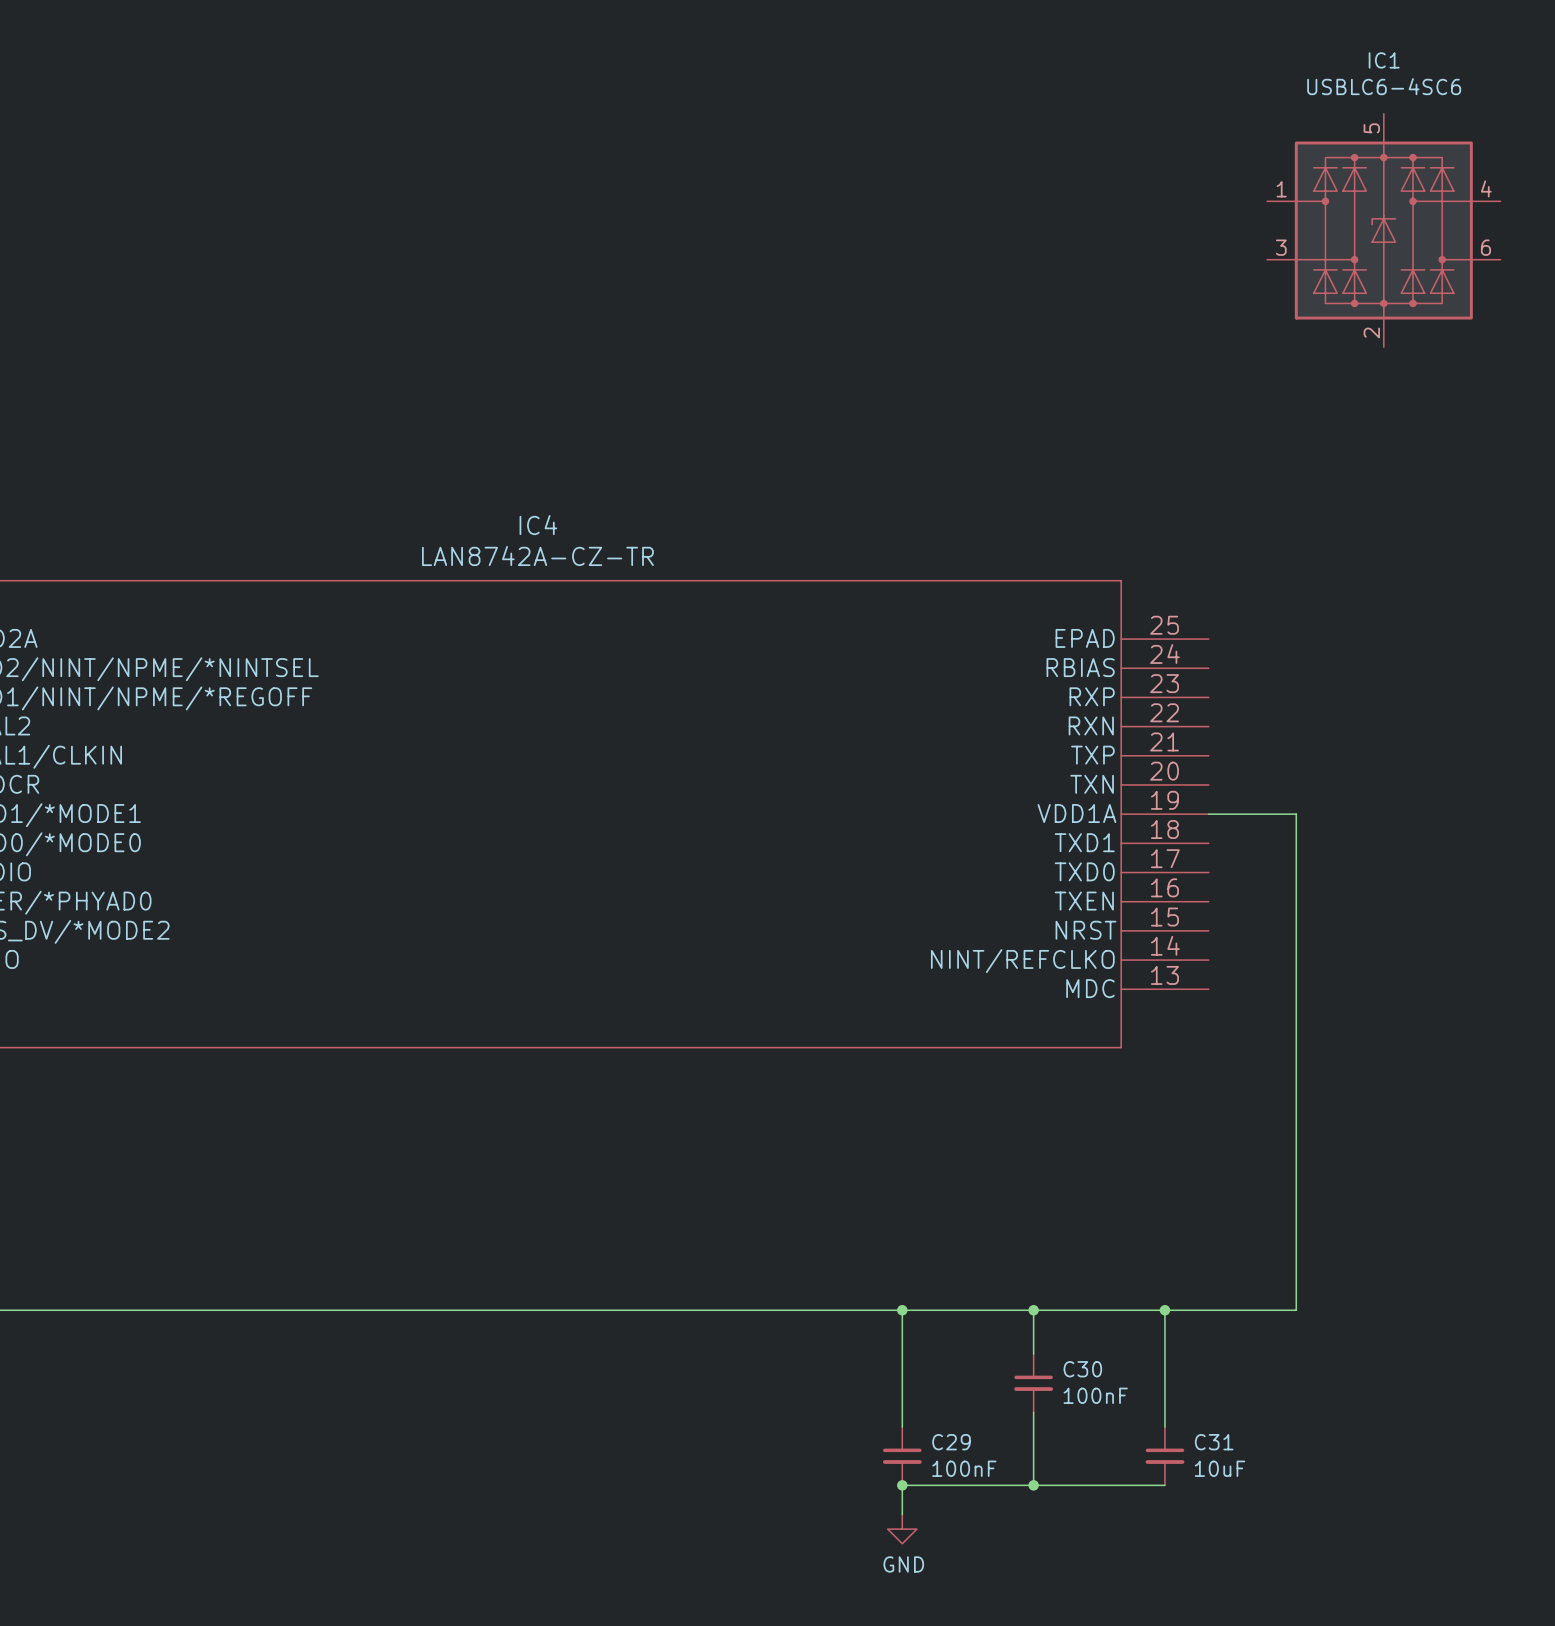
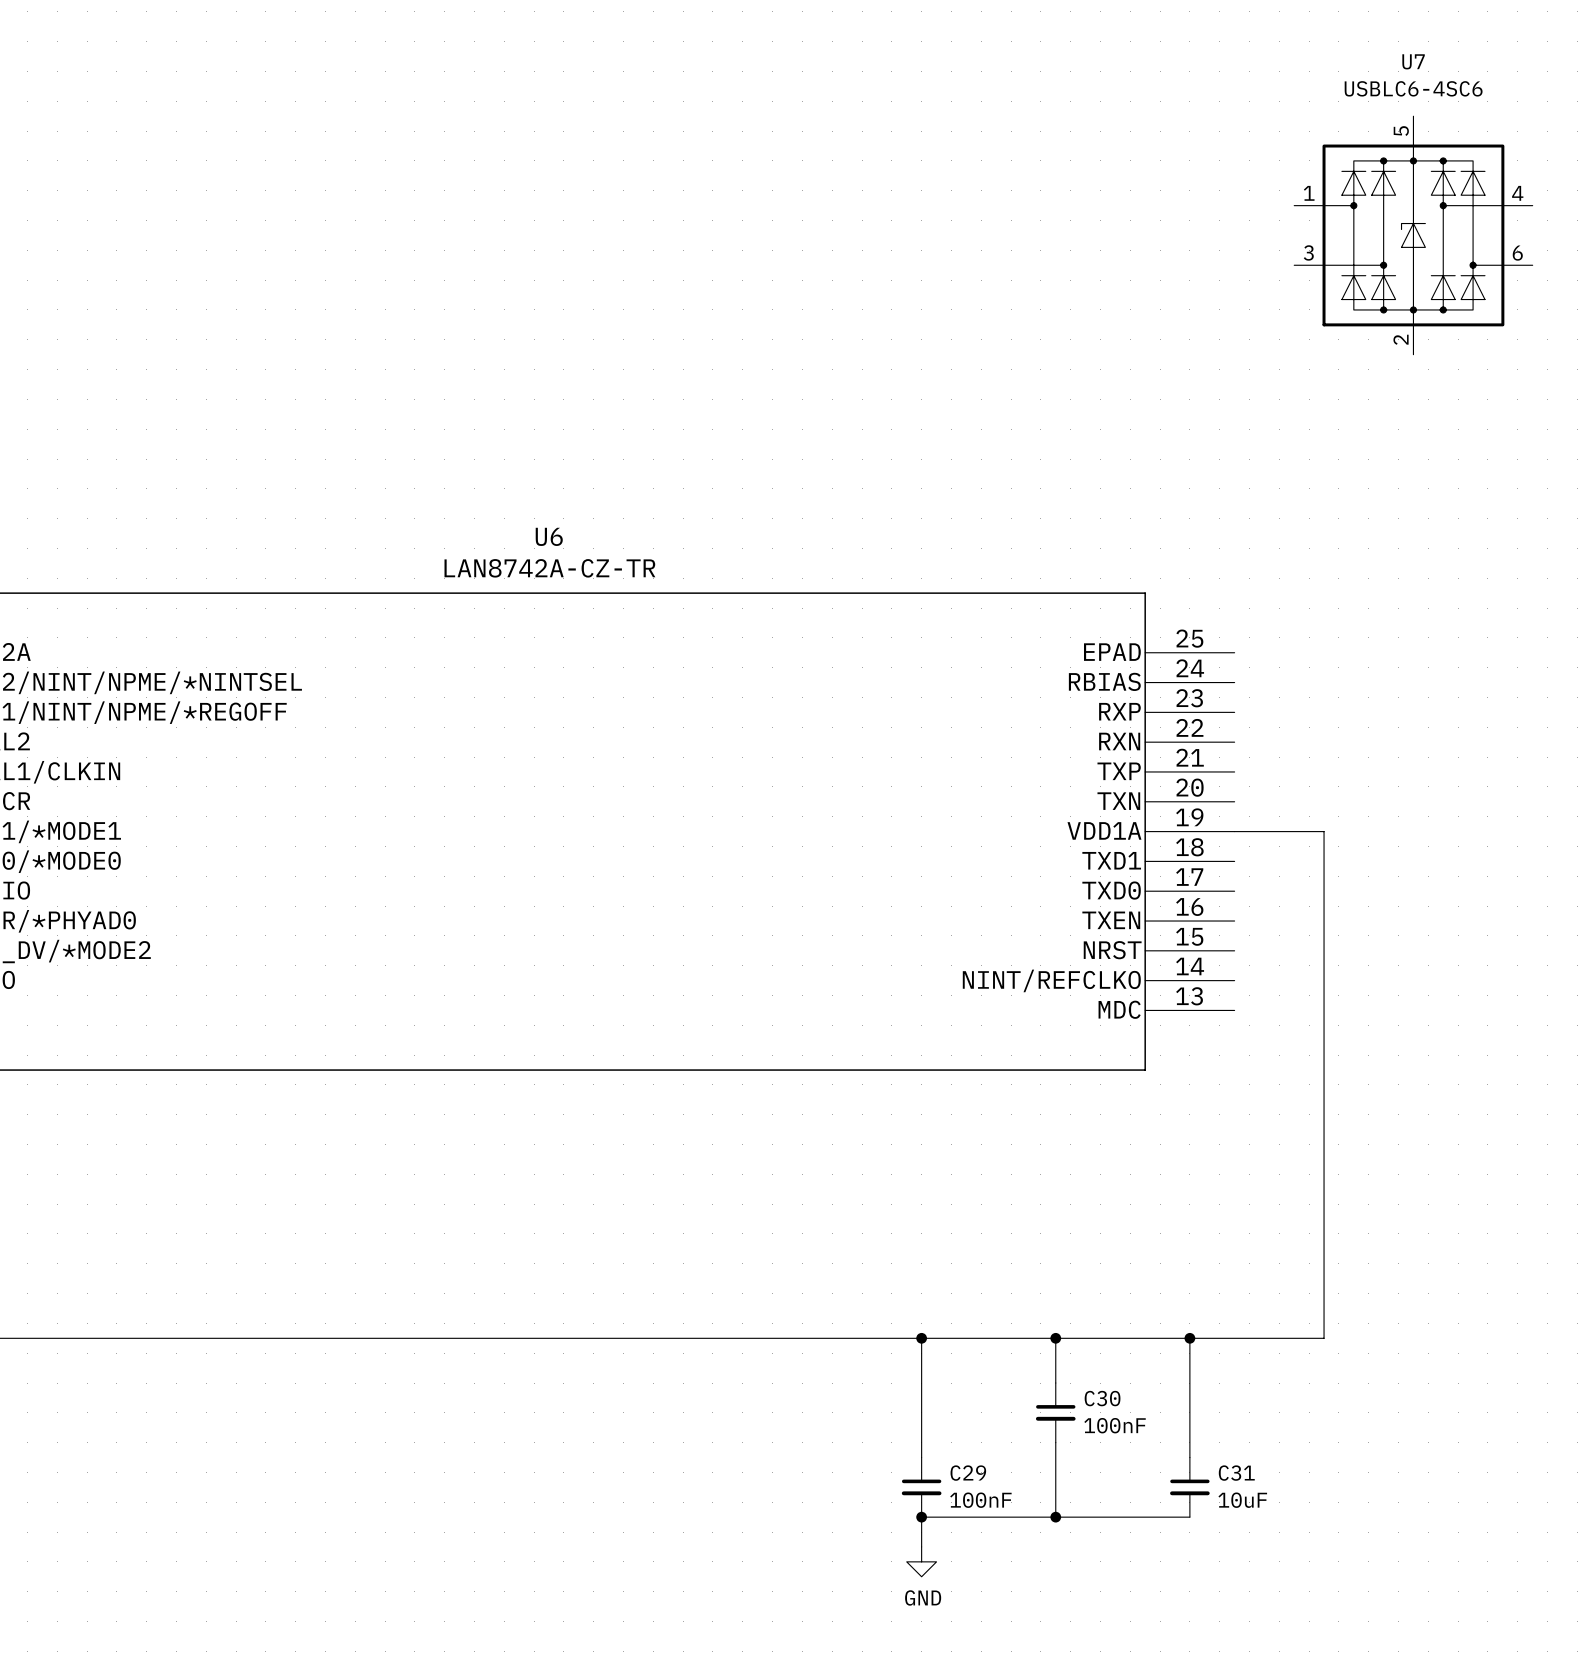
IC1 name: IC1 (1384, 60) -> U7 (1413, 61)
IC4 name: IC4 (538, 525) -> U6 (549, 536)

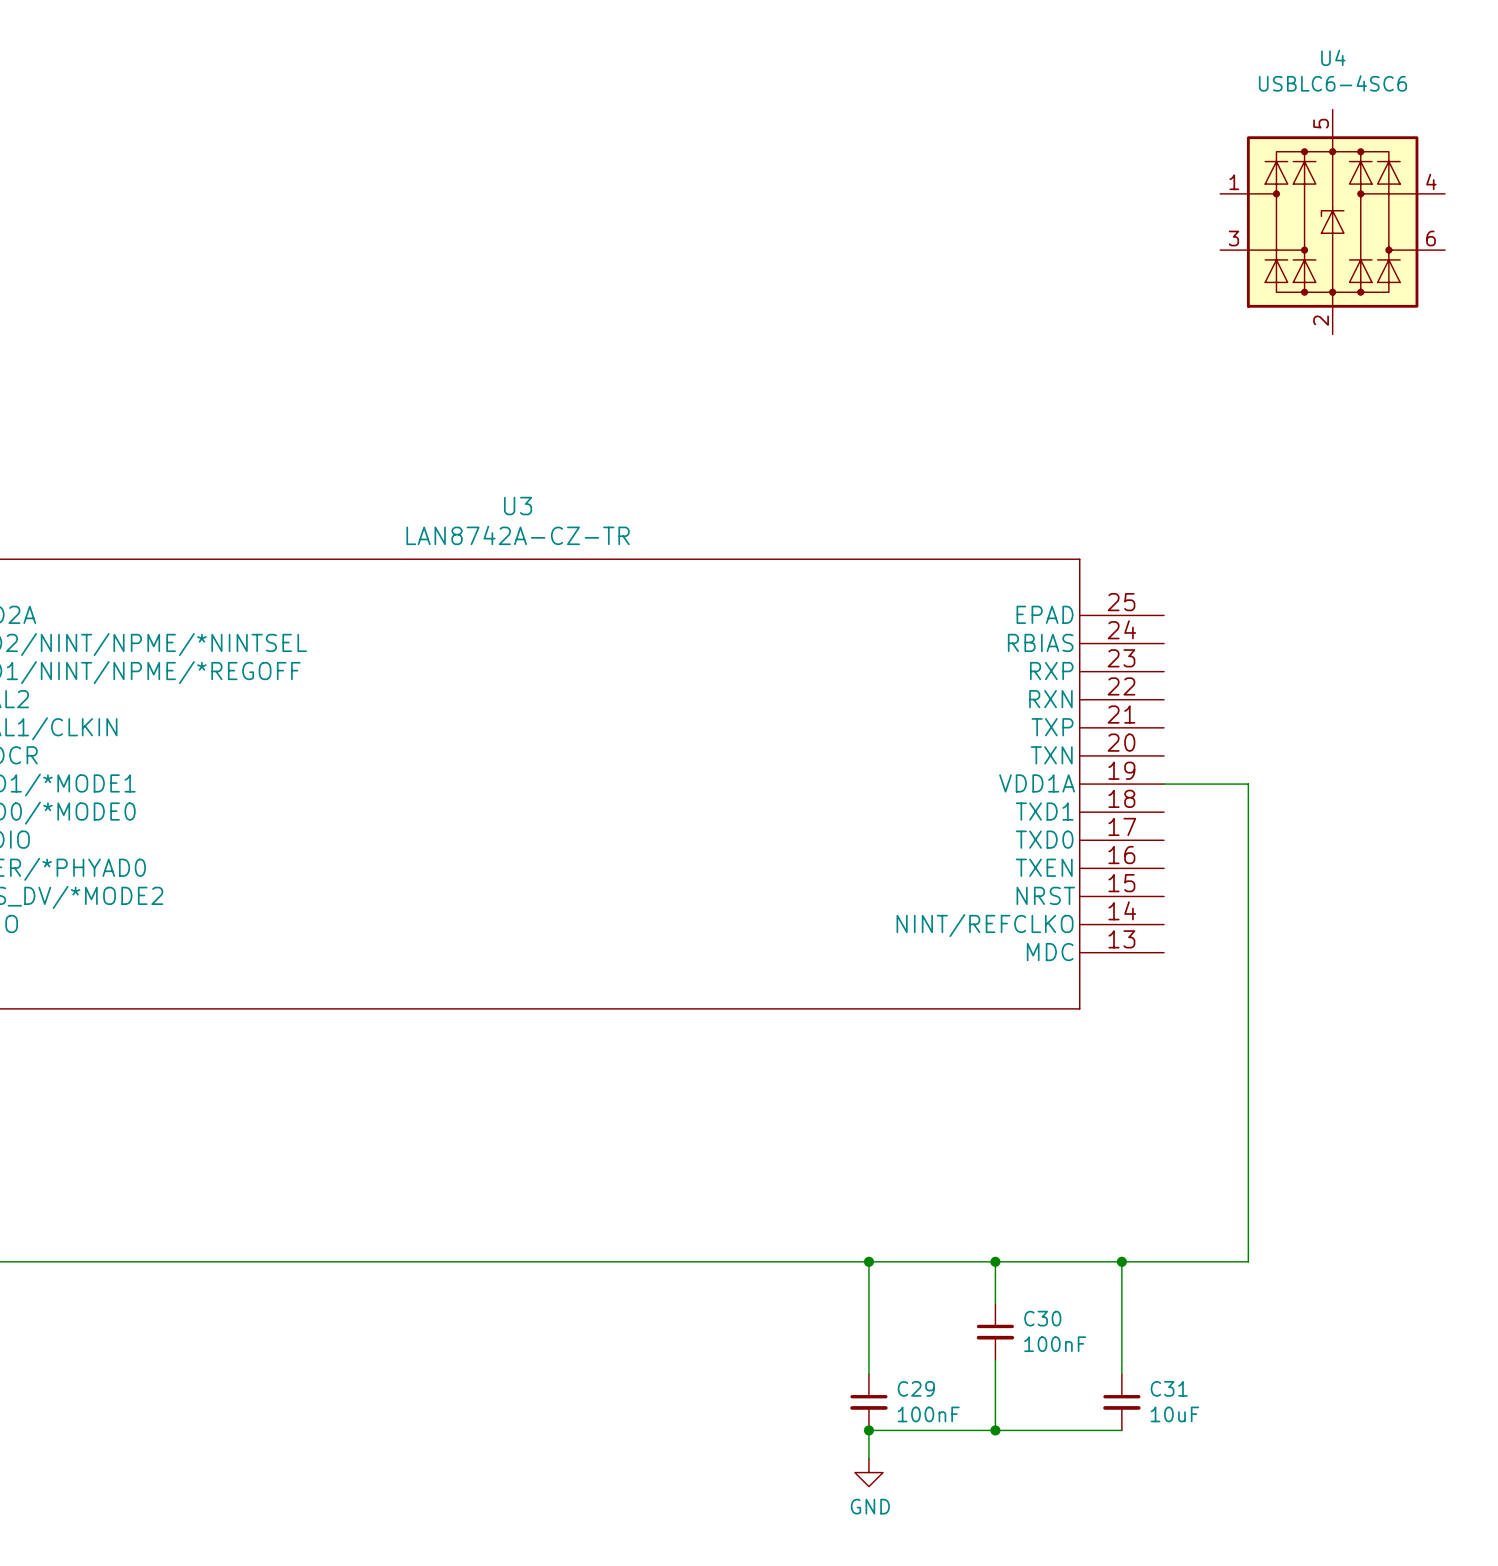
U7 name: U7 (1413, 61) -> U4 (1333, 57)
U6 name: U6 (549, 536) -> U3 (518, 506)

